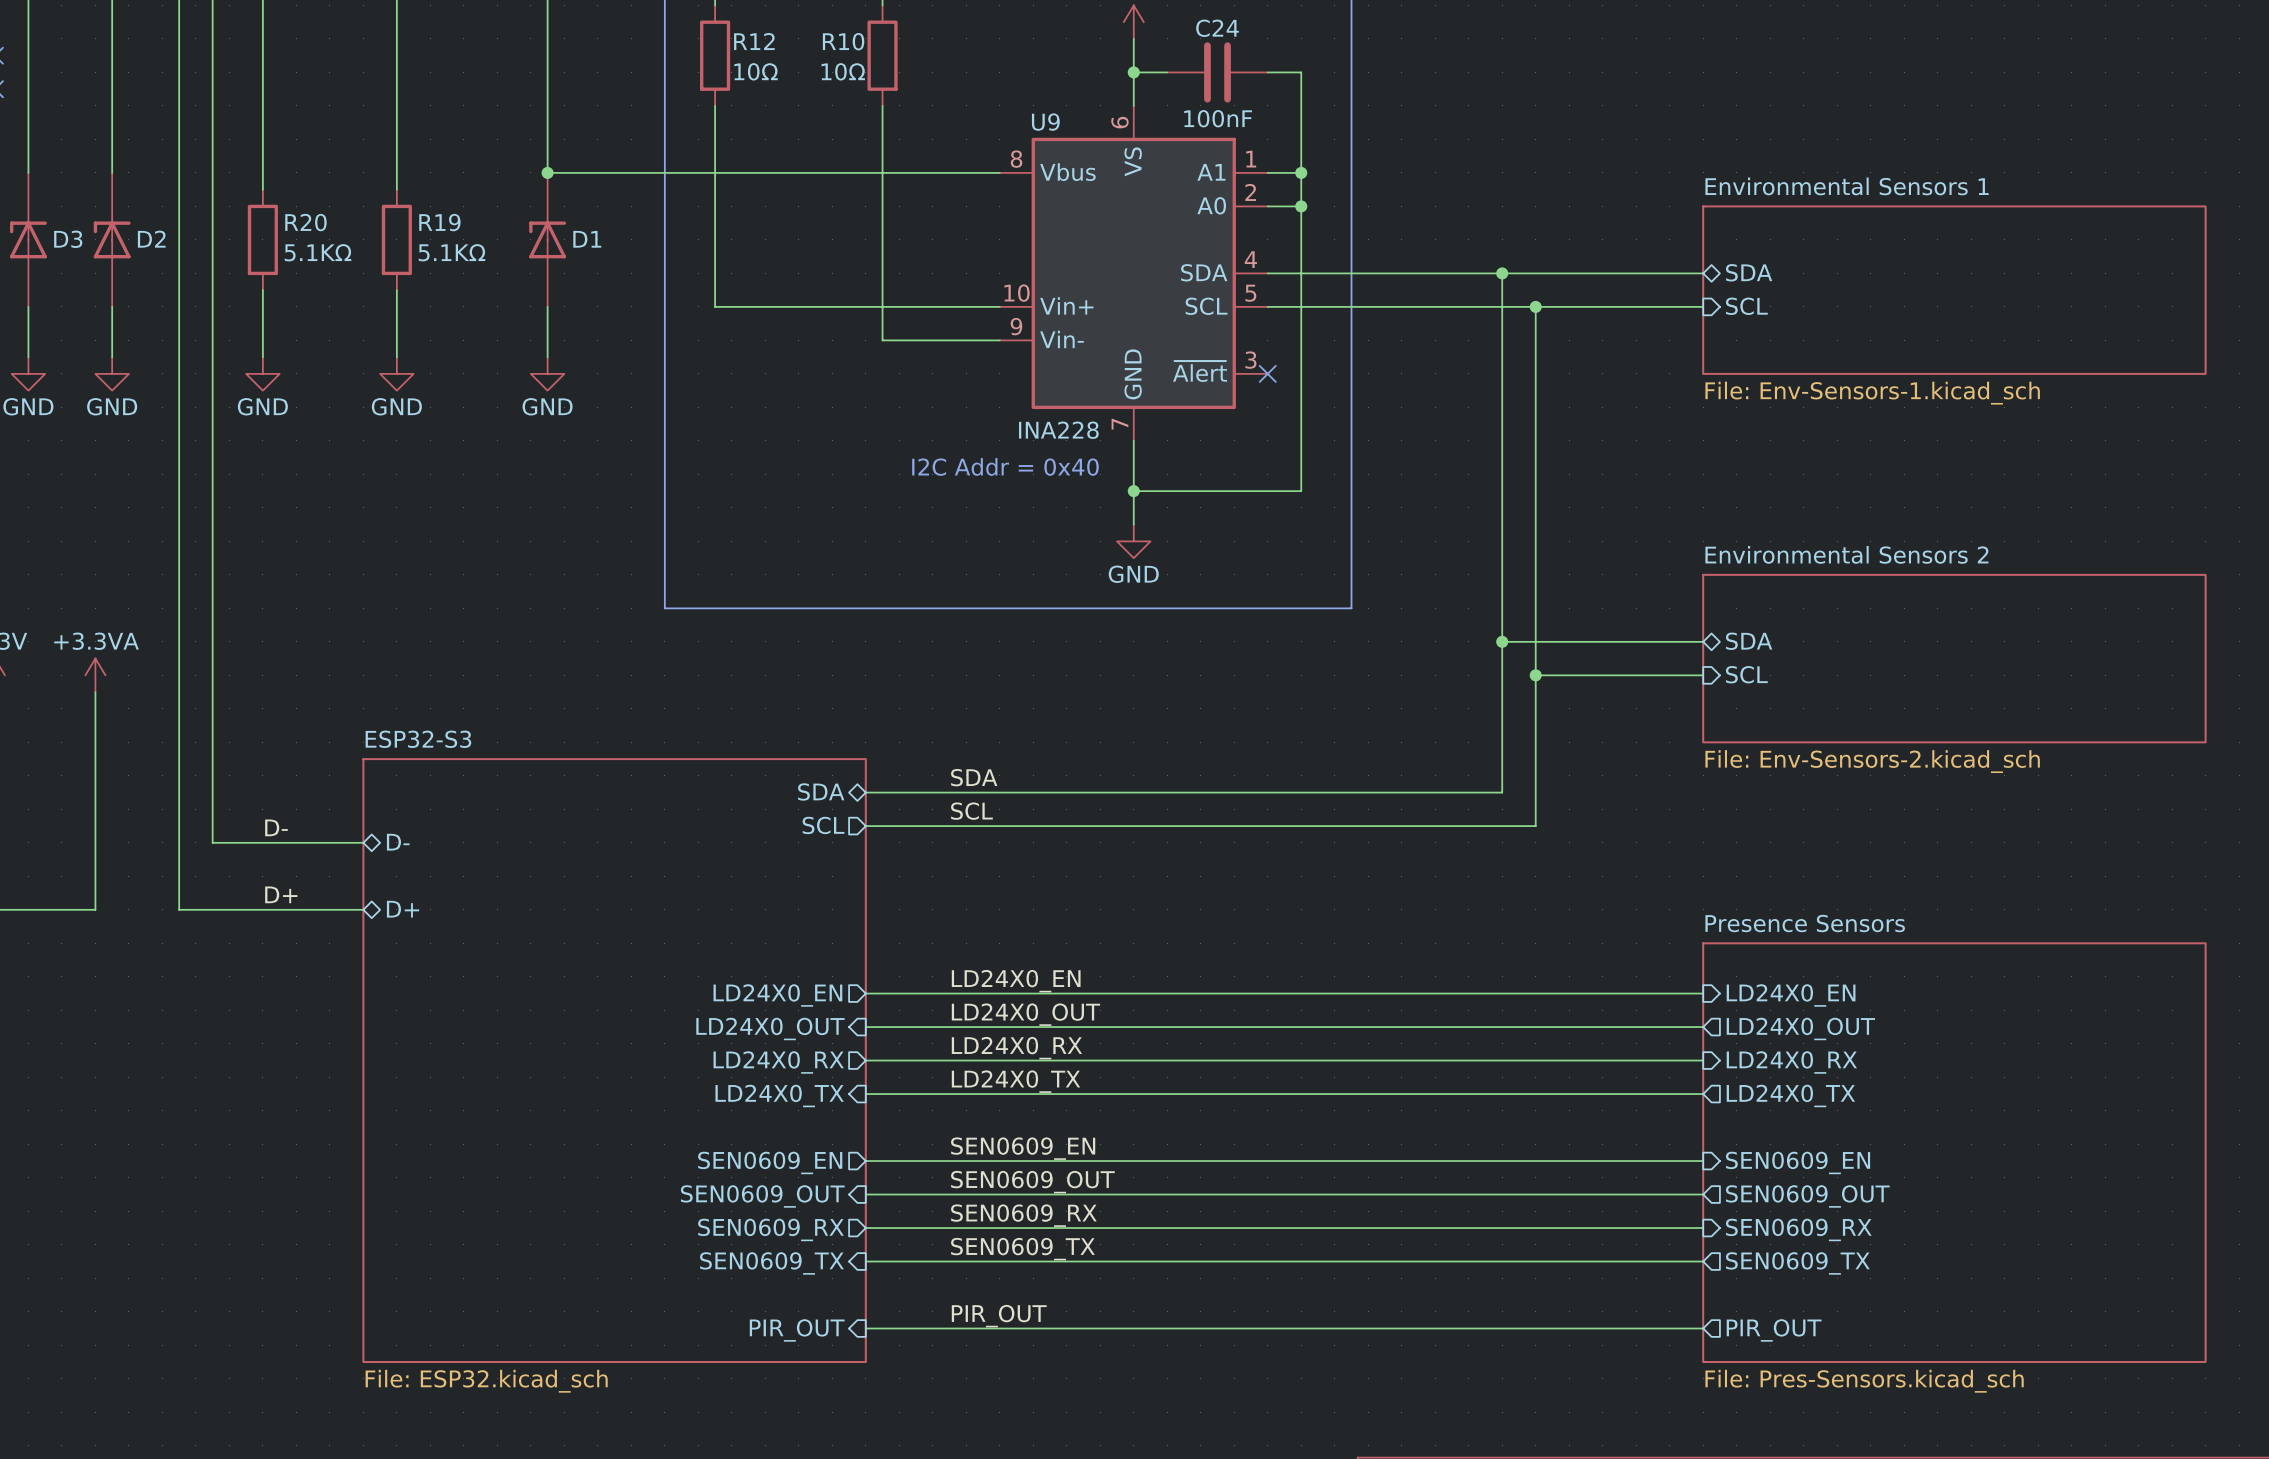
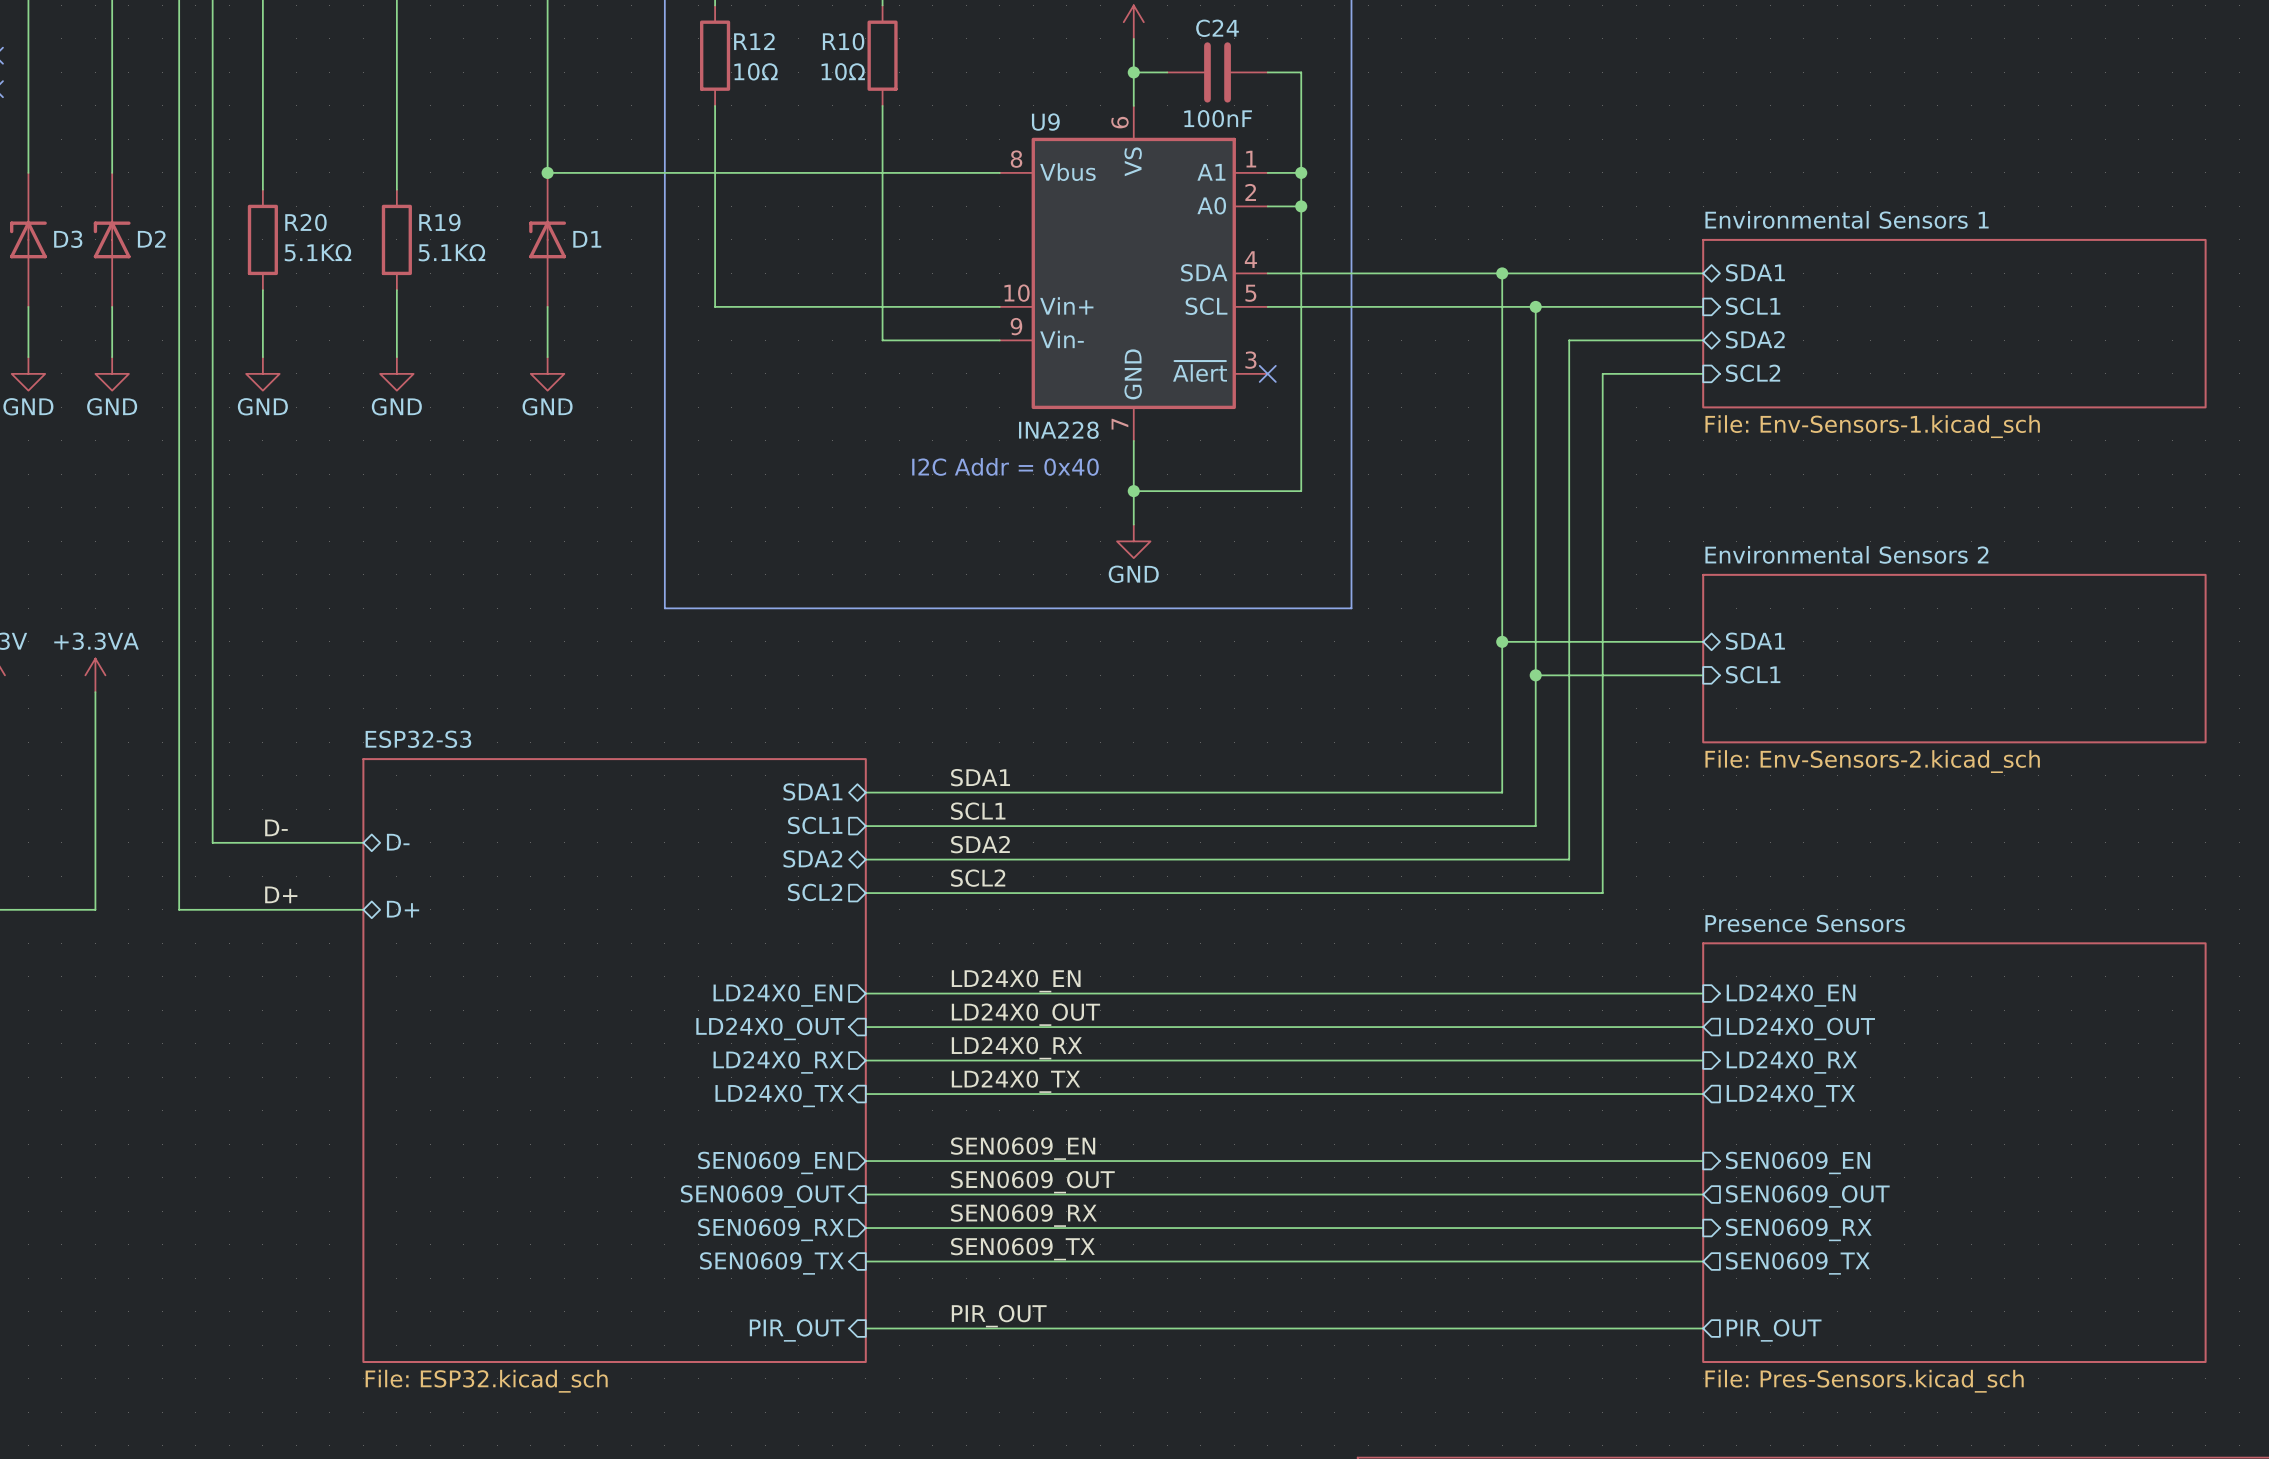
sheet pin: SDA (1749, 272) -> SDA1 (1755, 272)
sheet Environmental Sensors 1 position: (1954, 290) -> (1954, 323)
sheet pin: SCL (1746, 306) -> SCL1 (1753, 306)
sheet pin: none -> SDA2 (1755, 339)
wire: none -> (1703, 340) (1569, 340) (1569, 859) (865, 859)
wire: none -> (1703, 373) (1602, 373) (1602, 893) (865, 893)
sheet pin: none -> SCL2 (1753, 373)
sheet pin: SDA (1749, 641) -> SDA1 (1755, 641)
sheet pin: SCL (1746, 674) -> SCL1 (1753, 674)
label: SDA (974, 777) -> SDA1 (980, 777)
sheet pin: SDA (821, 791) -> SDA1 (812, 791)
label: SCL (971, 811) -> SCL1 (978, 811)
sheet pin: SCL (823, 825) -> SCL1 (815, 825)
label: none -> SDA2 (980, 844)
sheet pin: none -> SDA2 (812, 858)
label: none -> SCL2 (978, 878)
sheet pin: none -> SCL2 (815, 892)

